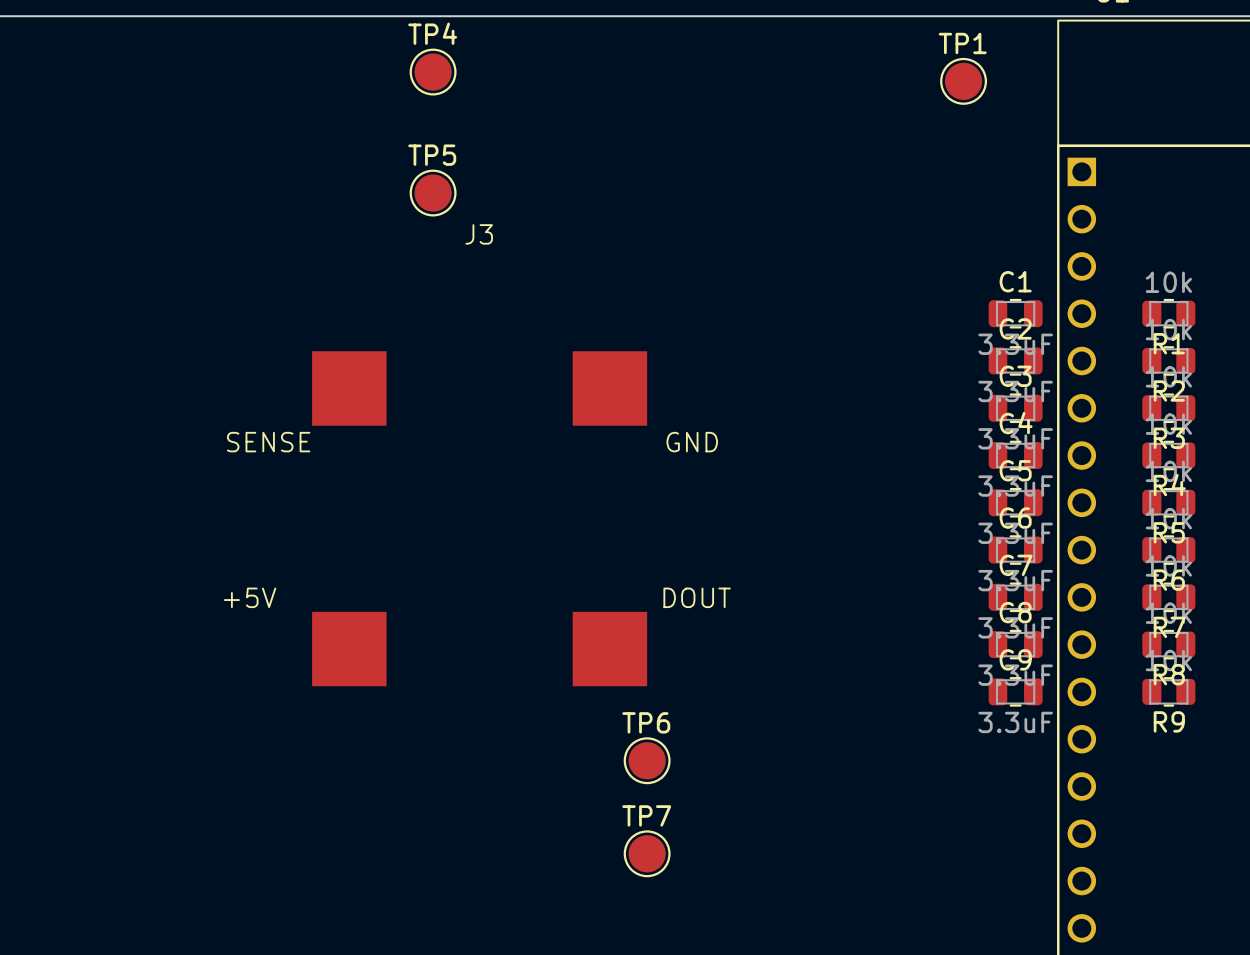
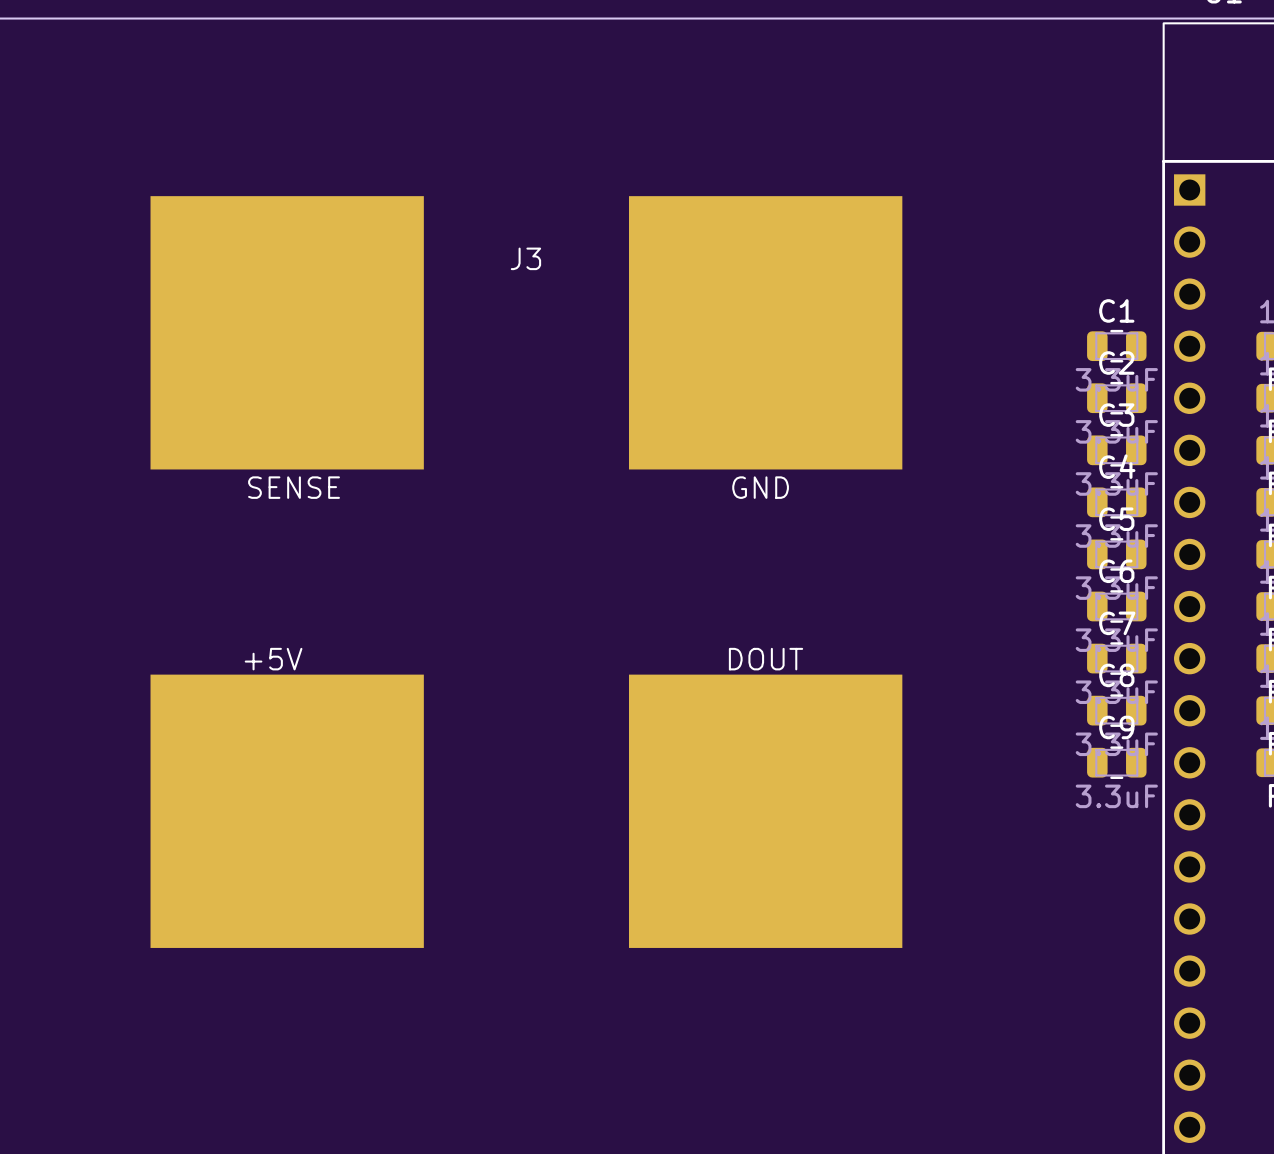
TP4: (433, 72) -> none
TP1: (963, 81) -> none
TP5: (433, 193) -> none
J3 footprint: [312, 351, 648, 687] -> [150, 196, 903, 948]
TP6: (647, 760) -> none
TP7: (647, 853) -> none

